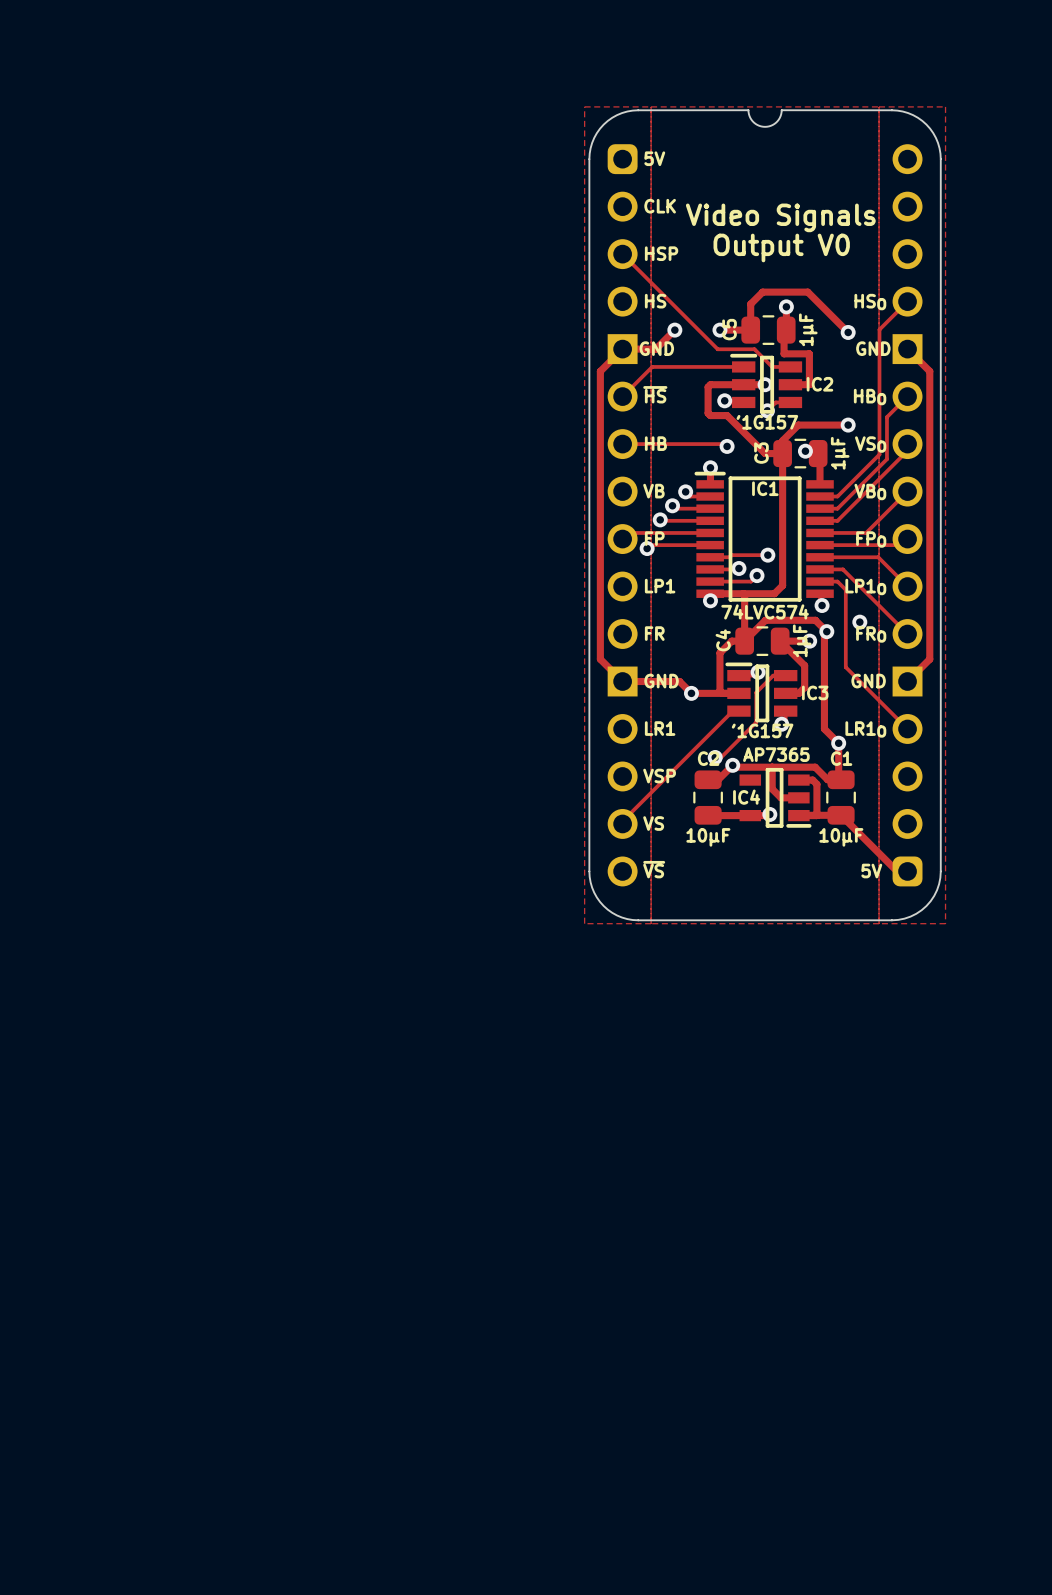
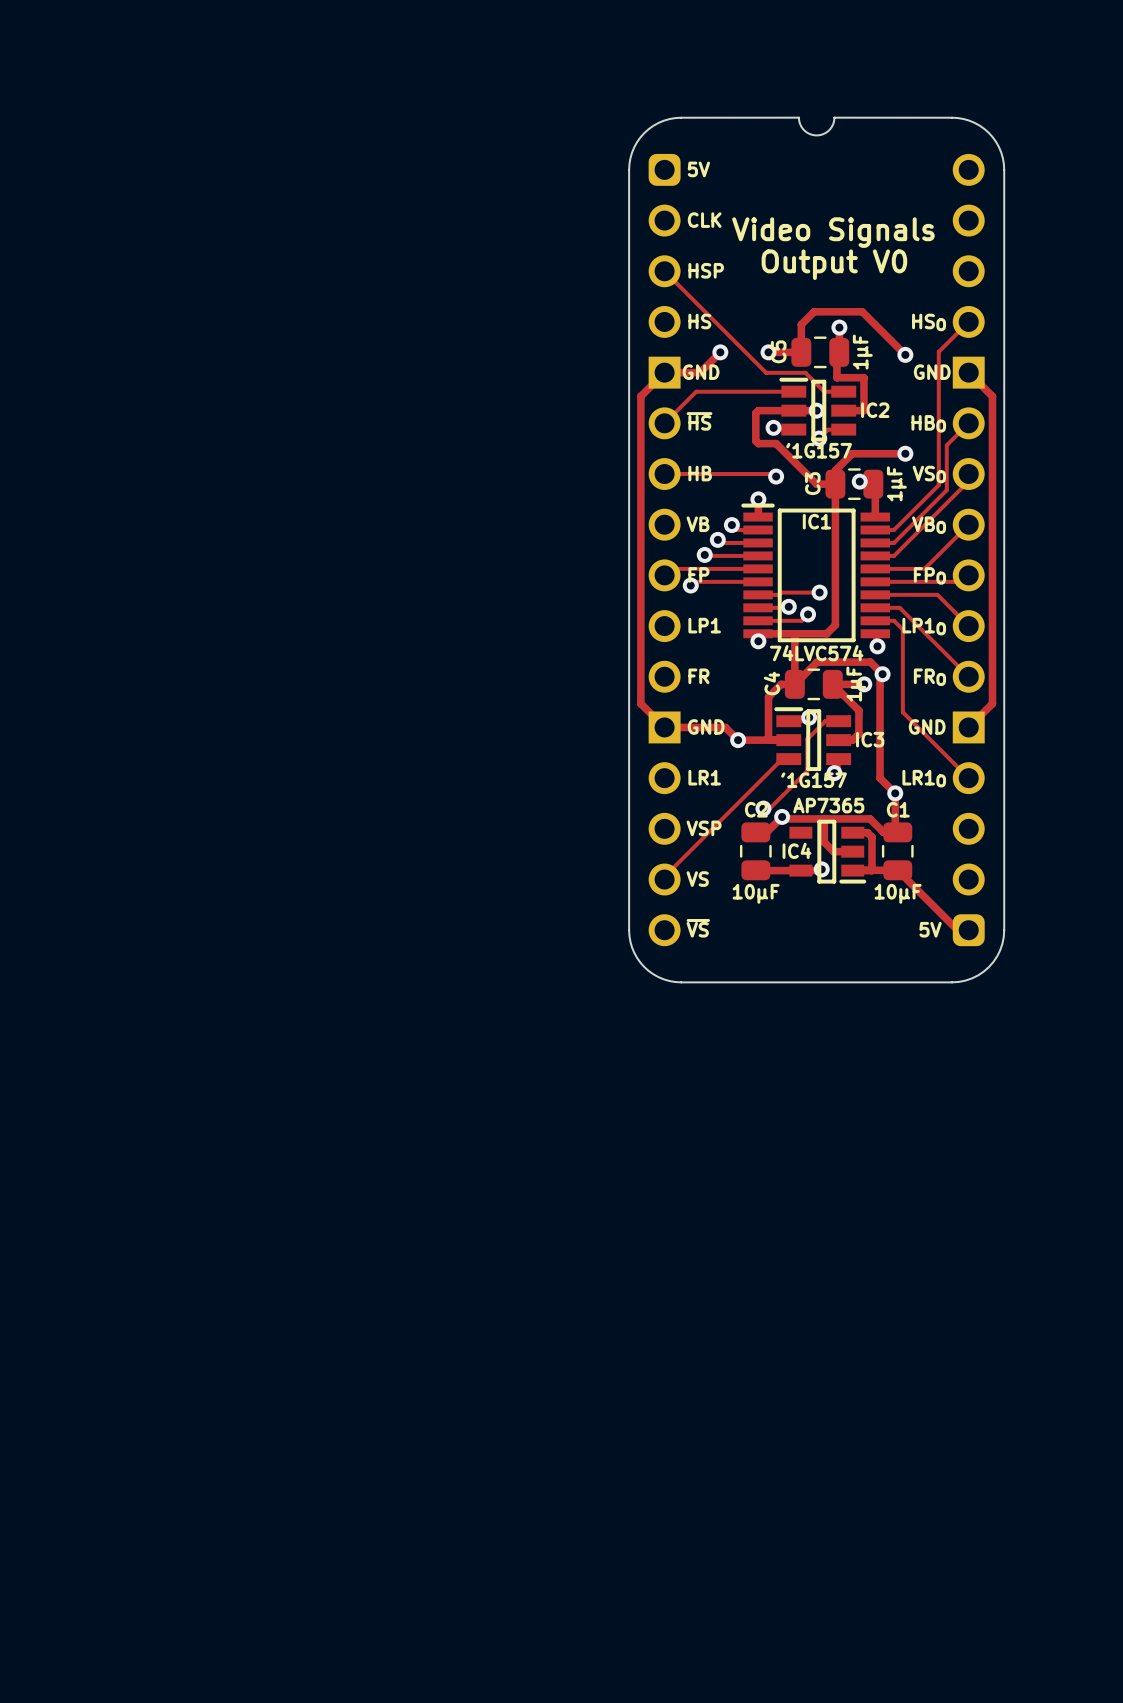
zone outline: (584, 106) (945, 106) (945, 923) (584, 923) (584, 106) -> none
zone outline: (651, 106) (651, 923) -> none
zone outline: (879, 106) (879, 923) -> none
via: (859, 622) -> none

